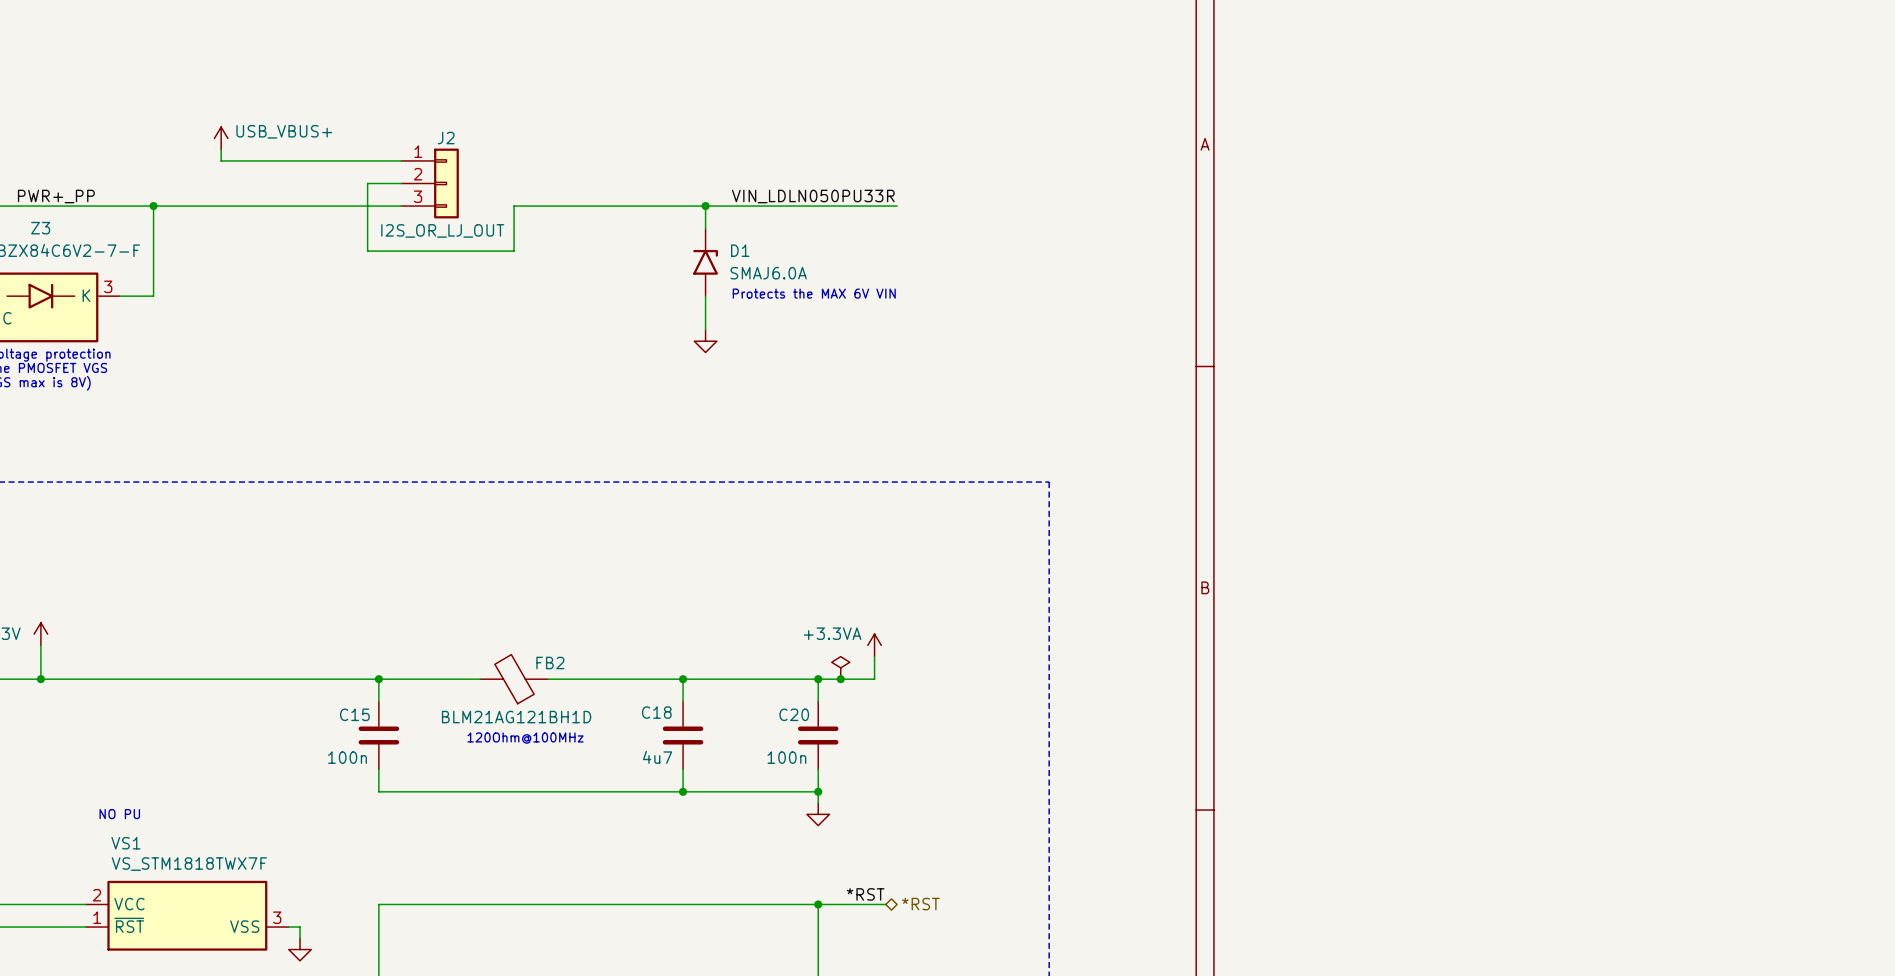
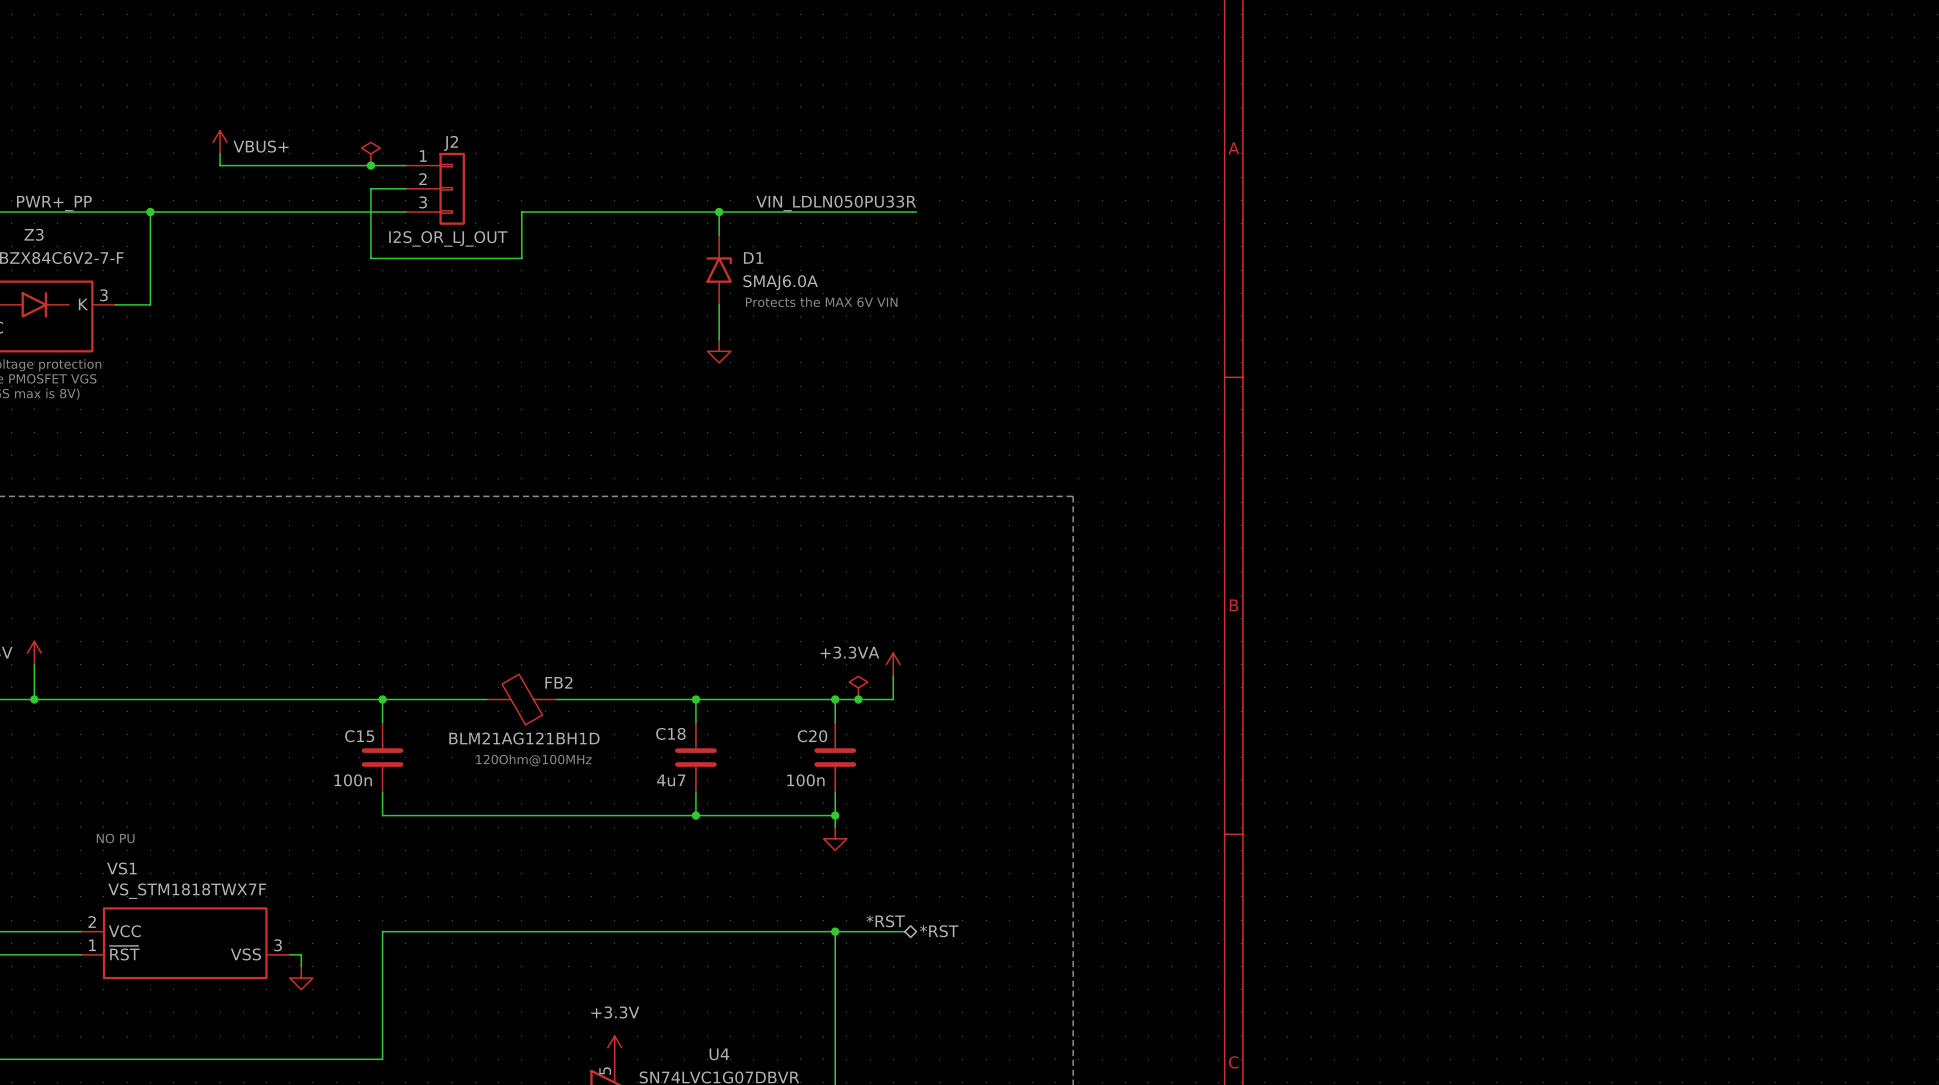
power symbol: USB_VBUS+ (221, 138) -> VBUS+ (220, 142)
power symbol: none -> (370, 153)
junction: none -> (370, 165)

